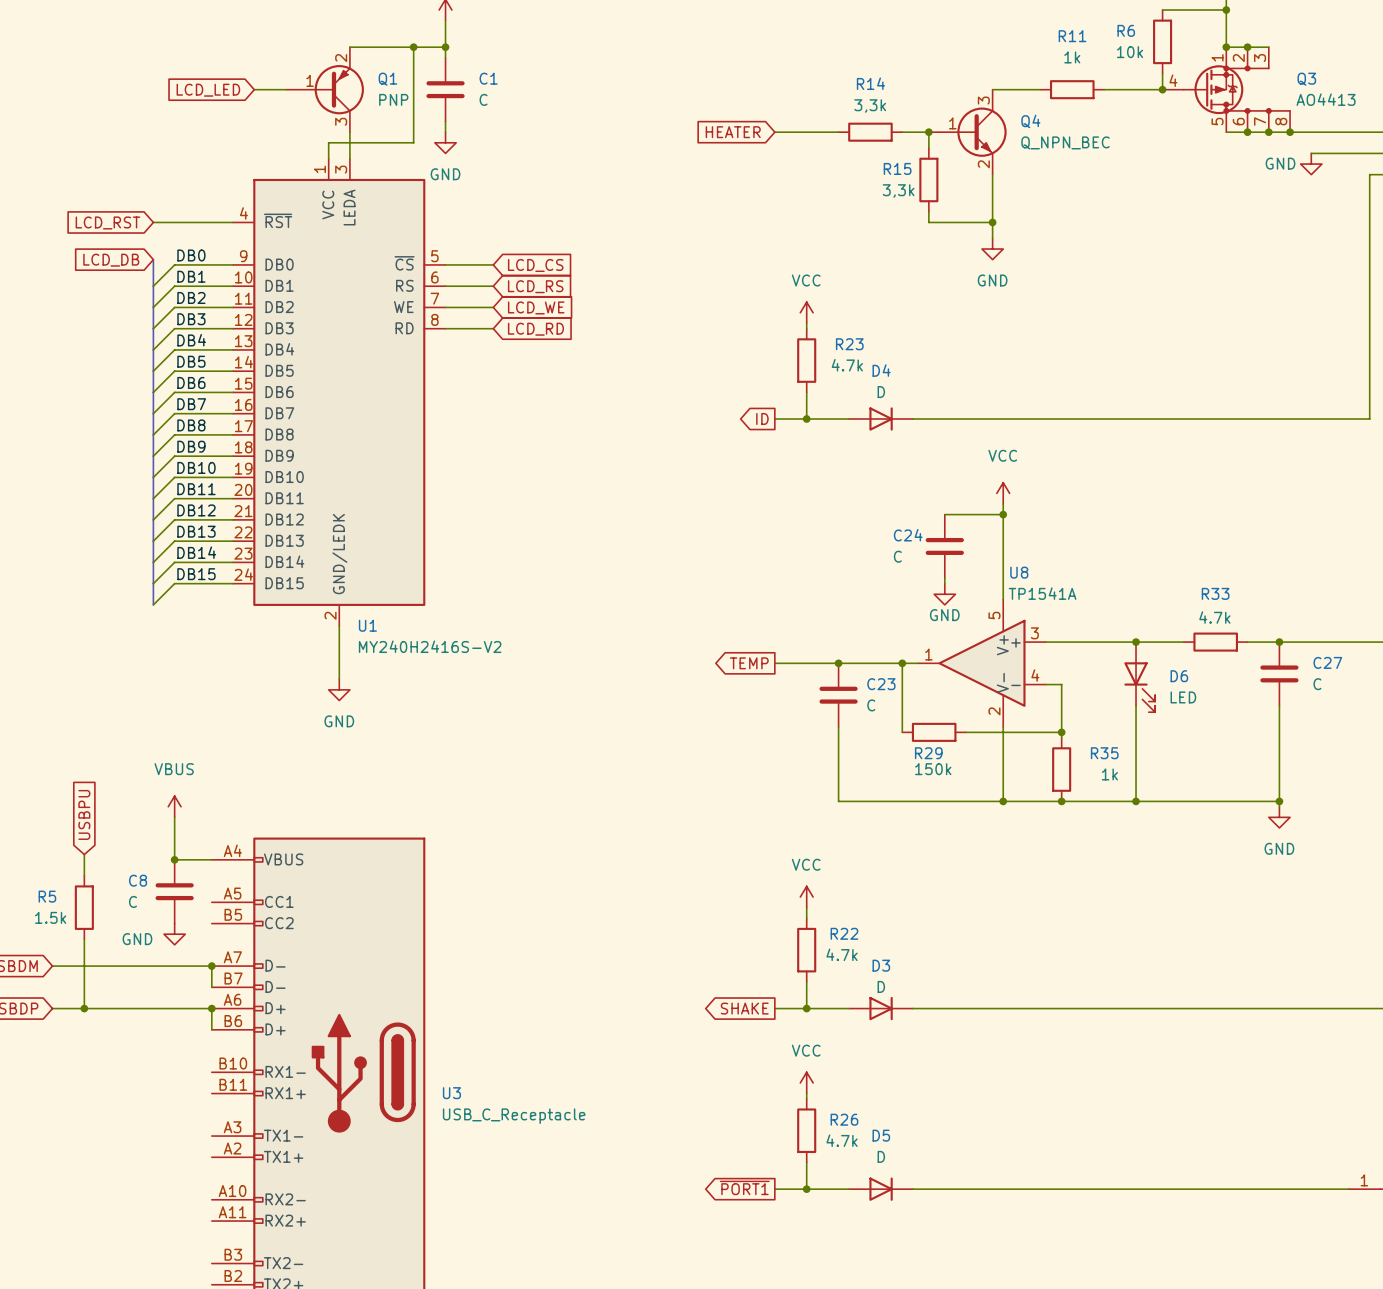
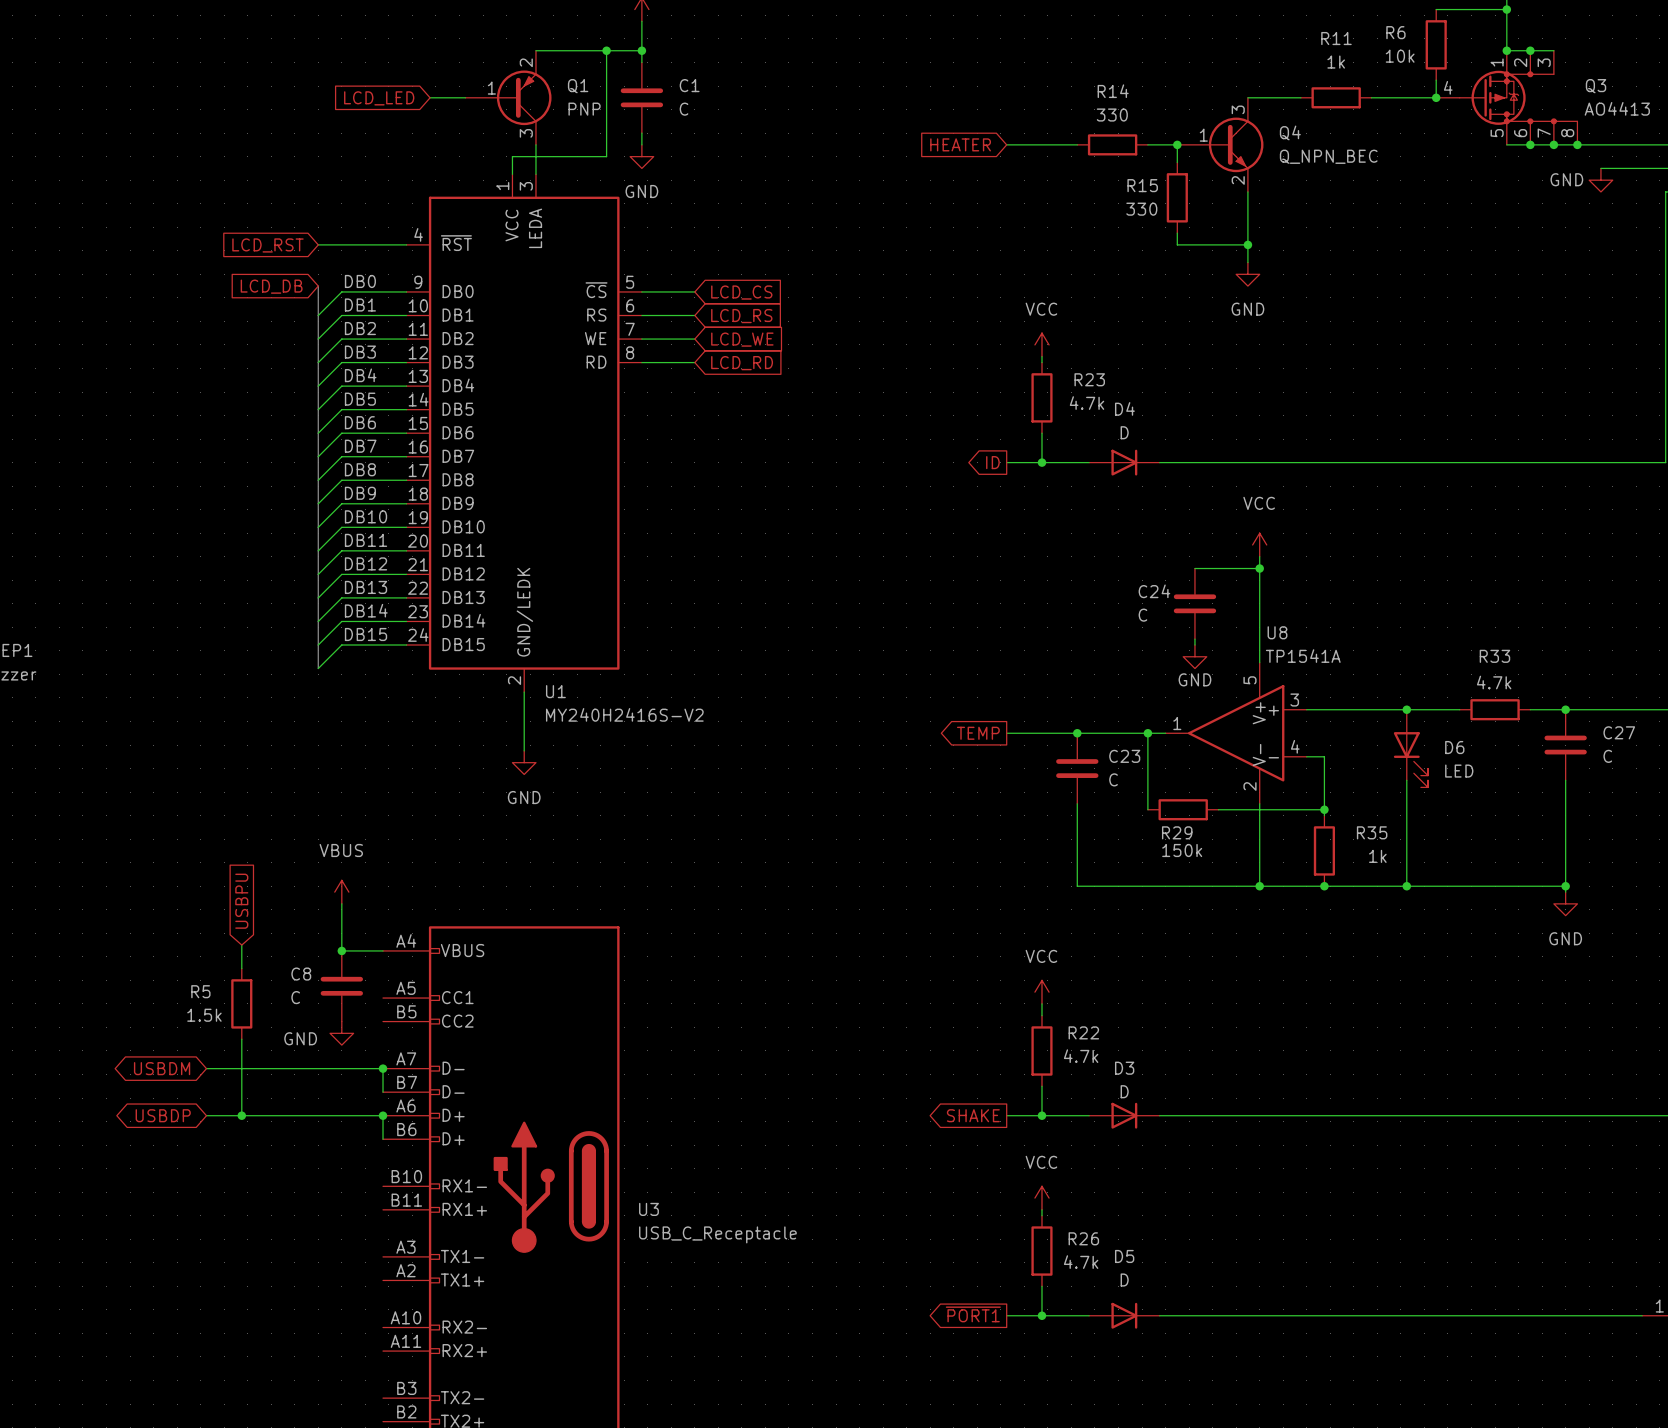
R14 value: 3,3k (870, 105) -> 330 (1112, 115)
R15 value: 3,3k (898, 190) -> 330 (1141, 209)

